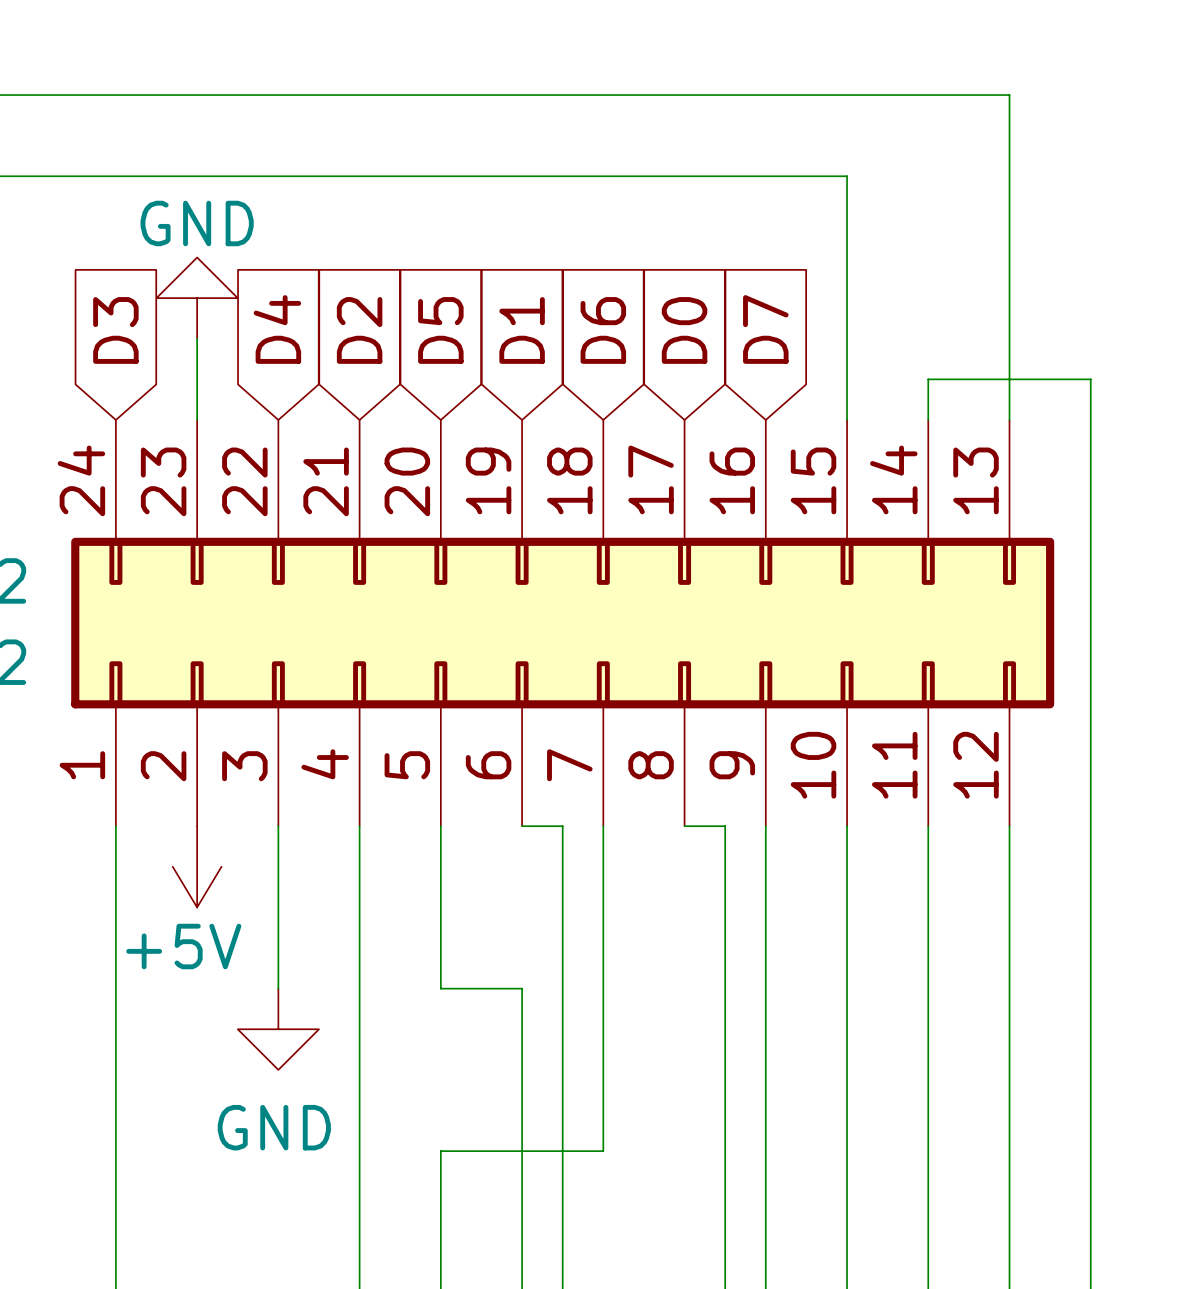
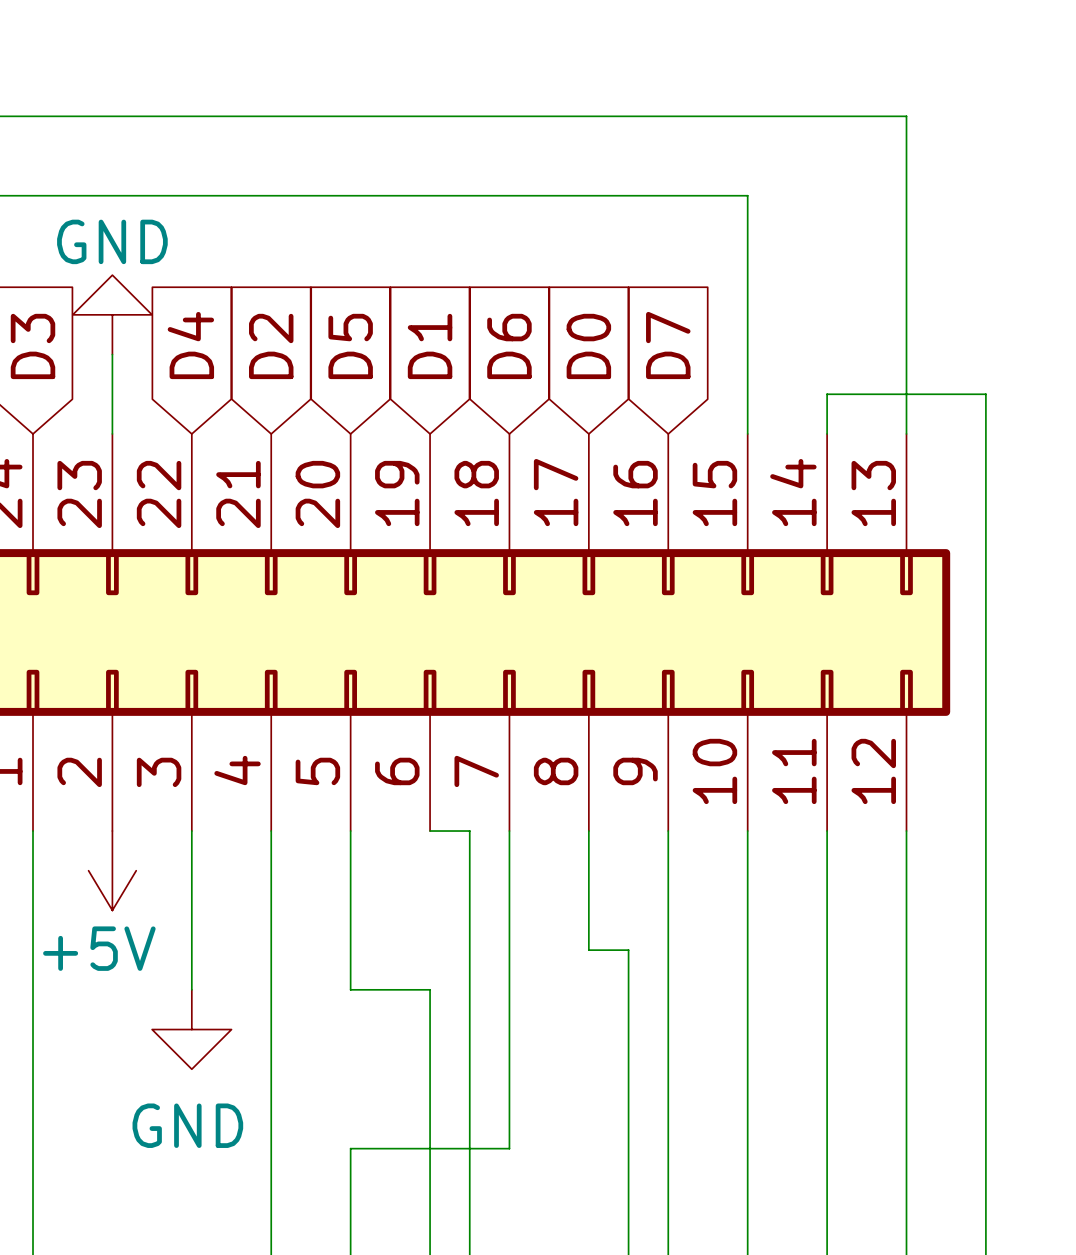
wire: (684, 826) (725, 826) (725, 948) -> (588, 831) (588, 950) (628, 950)

